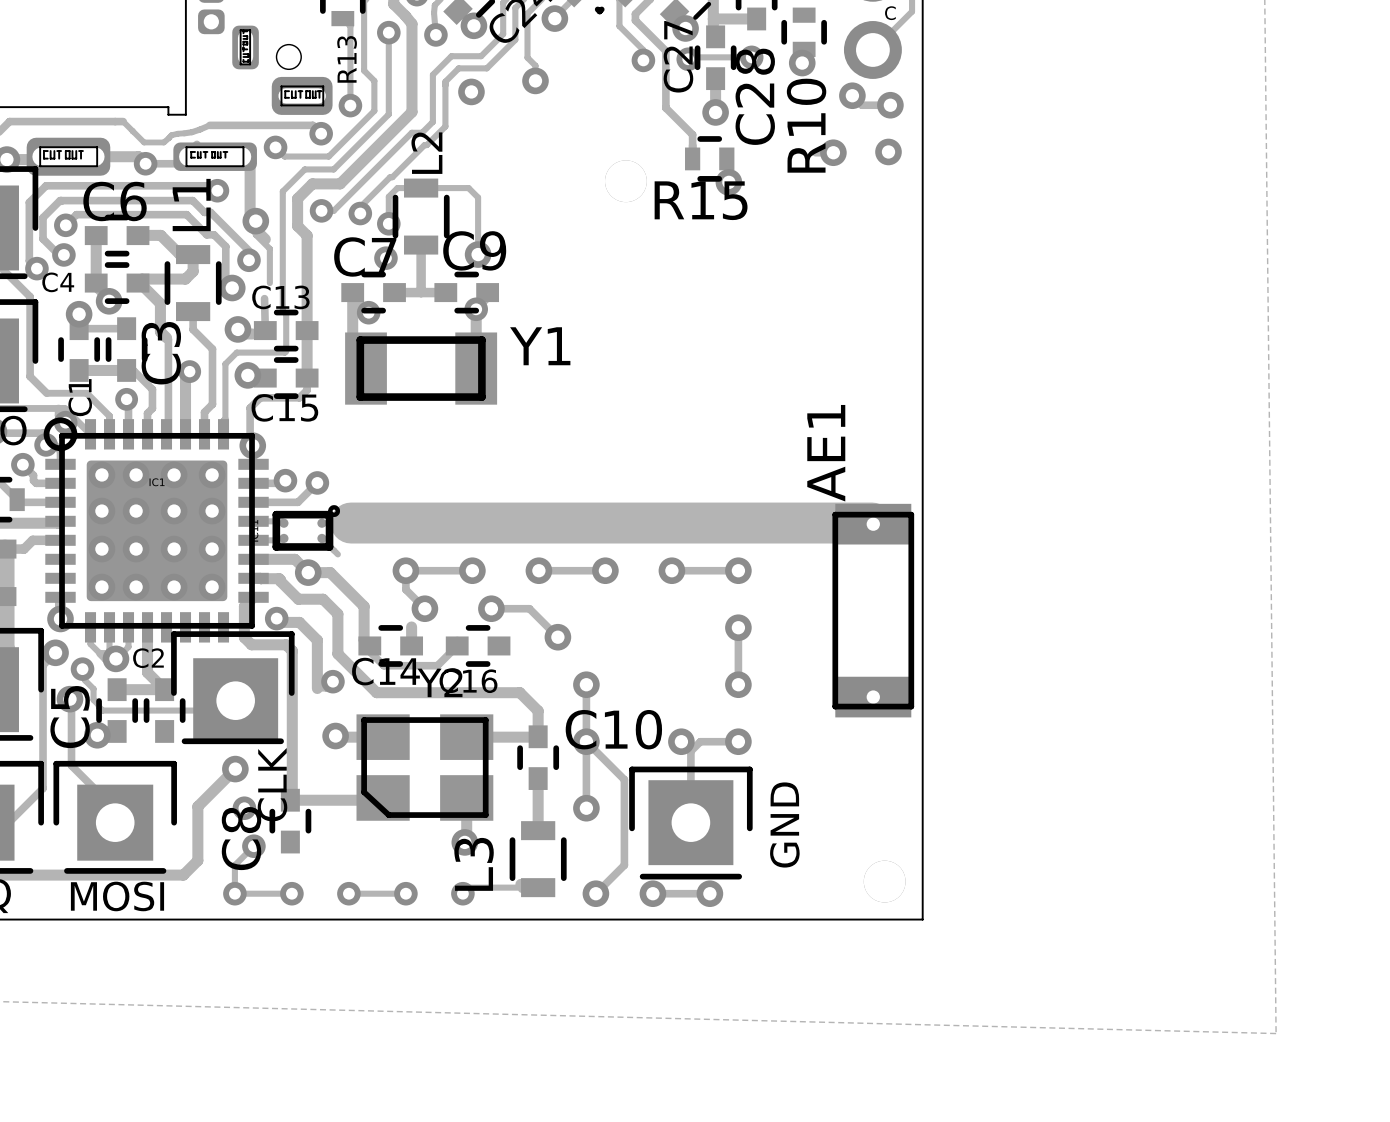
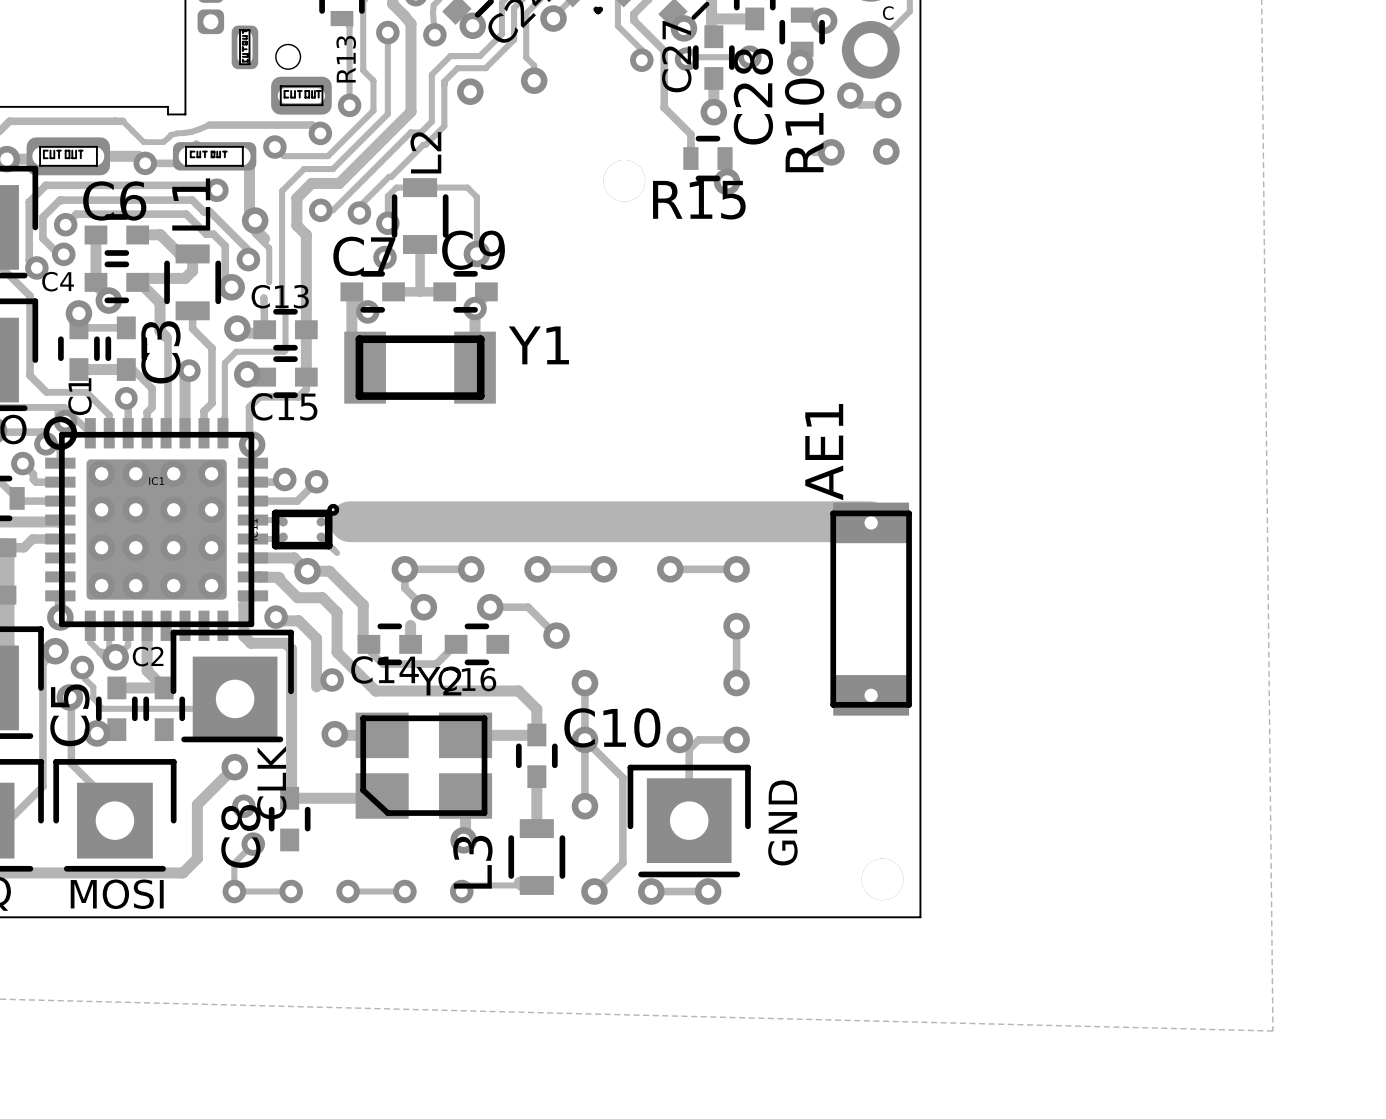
via: none -> (824, 20)

